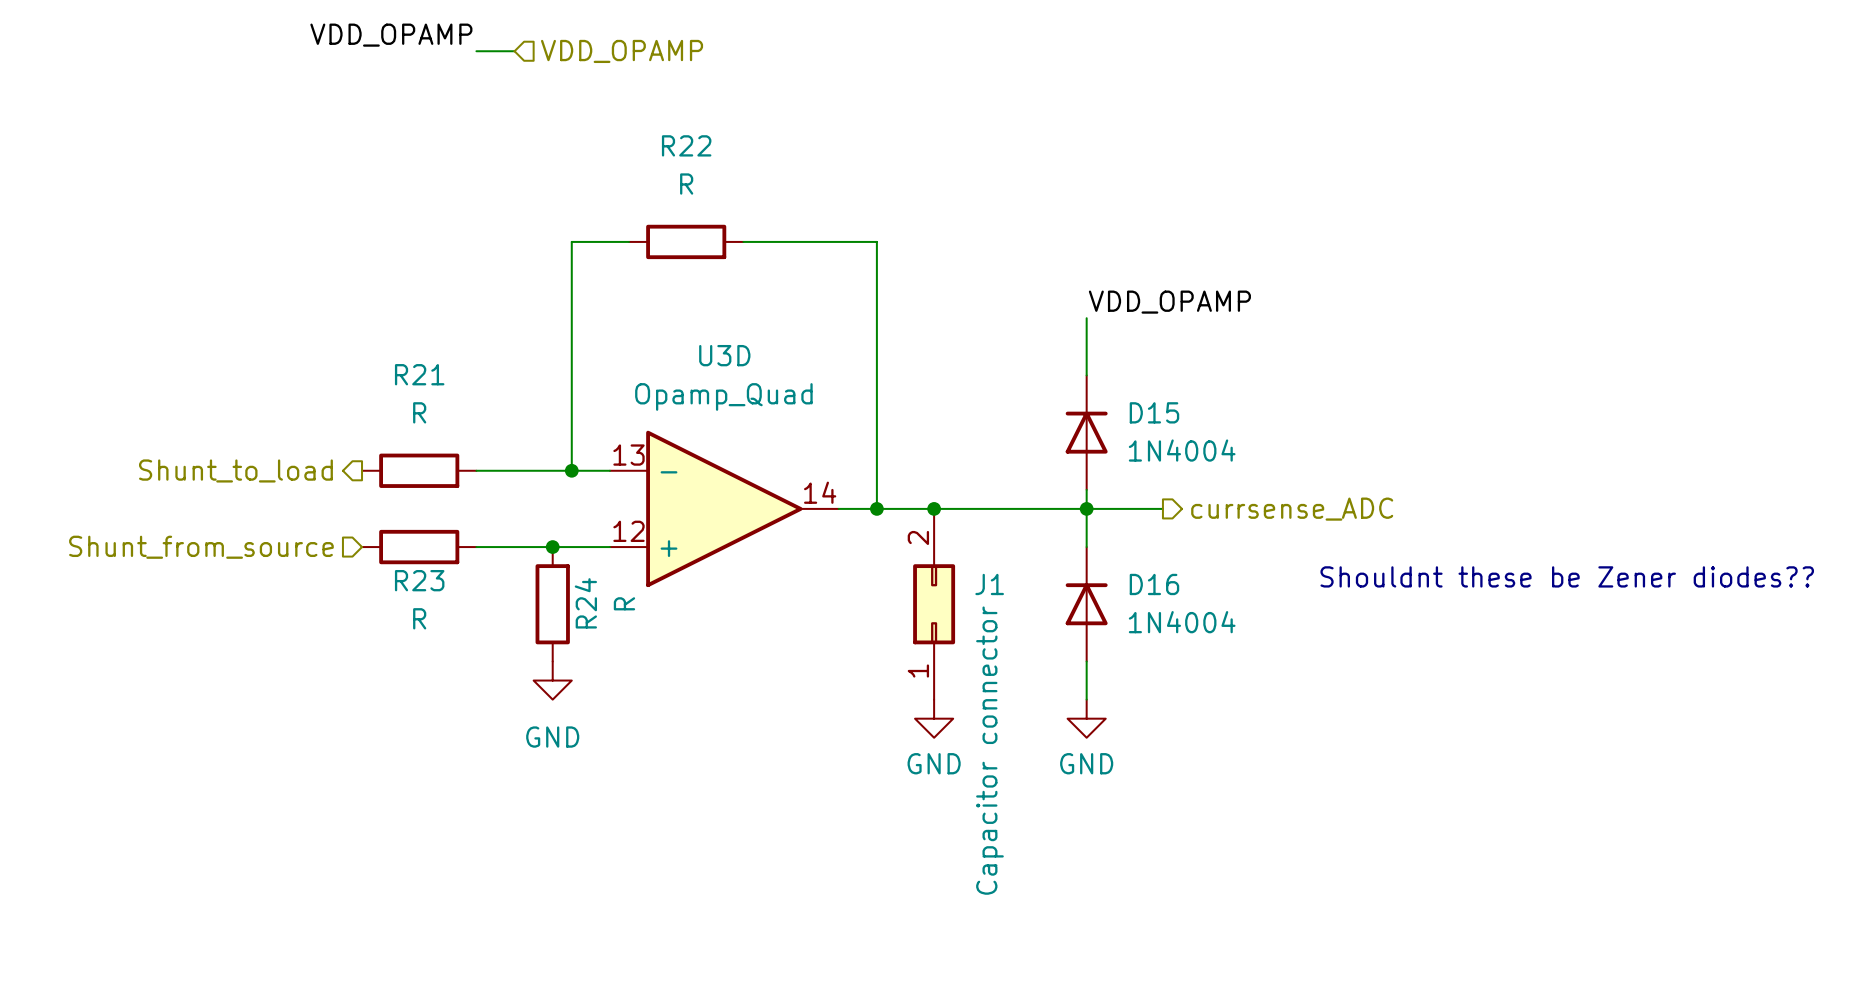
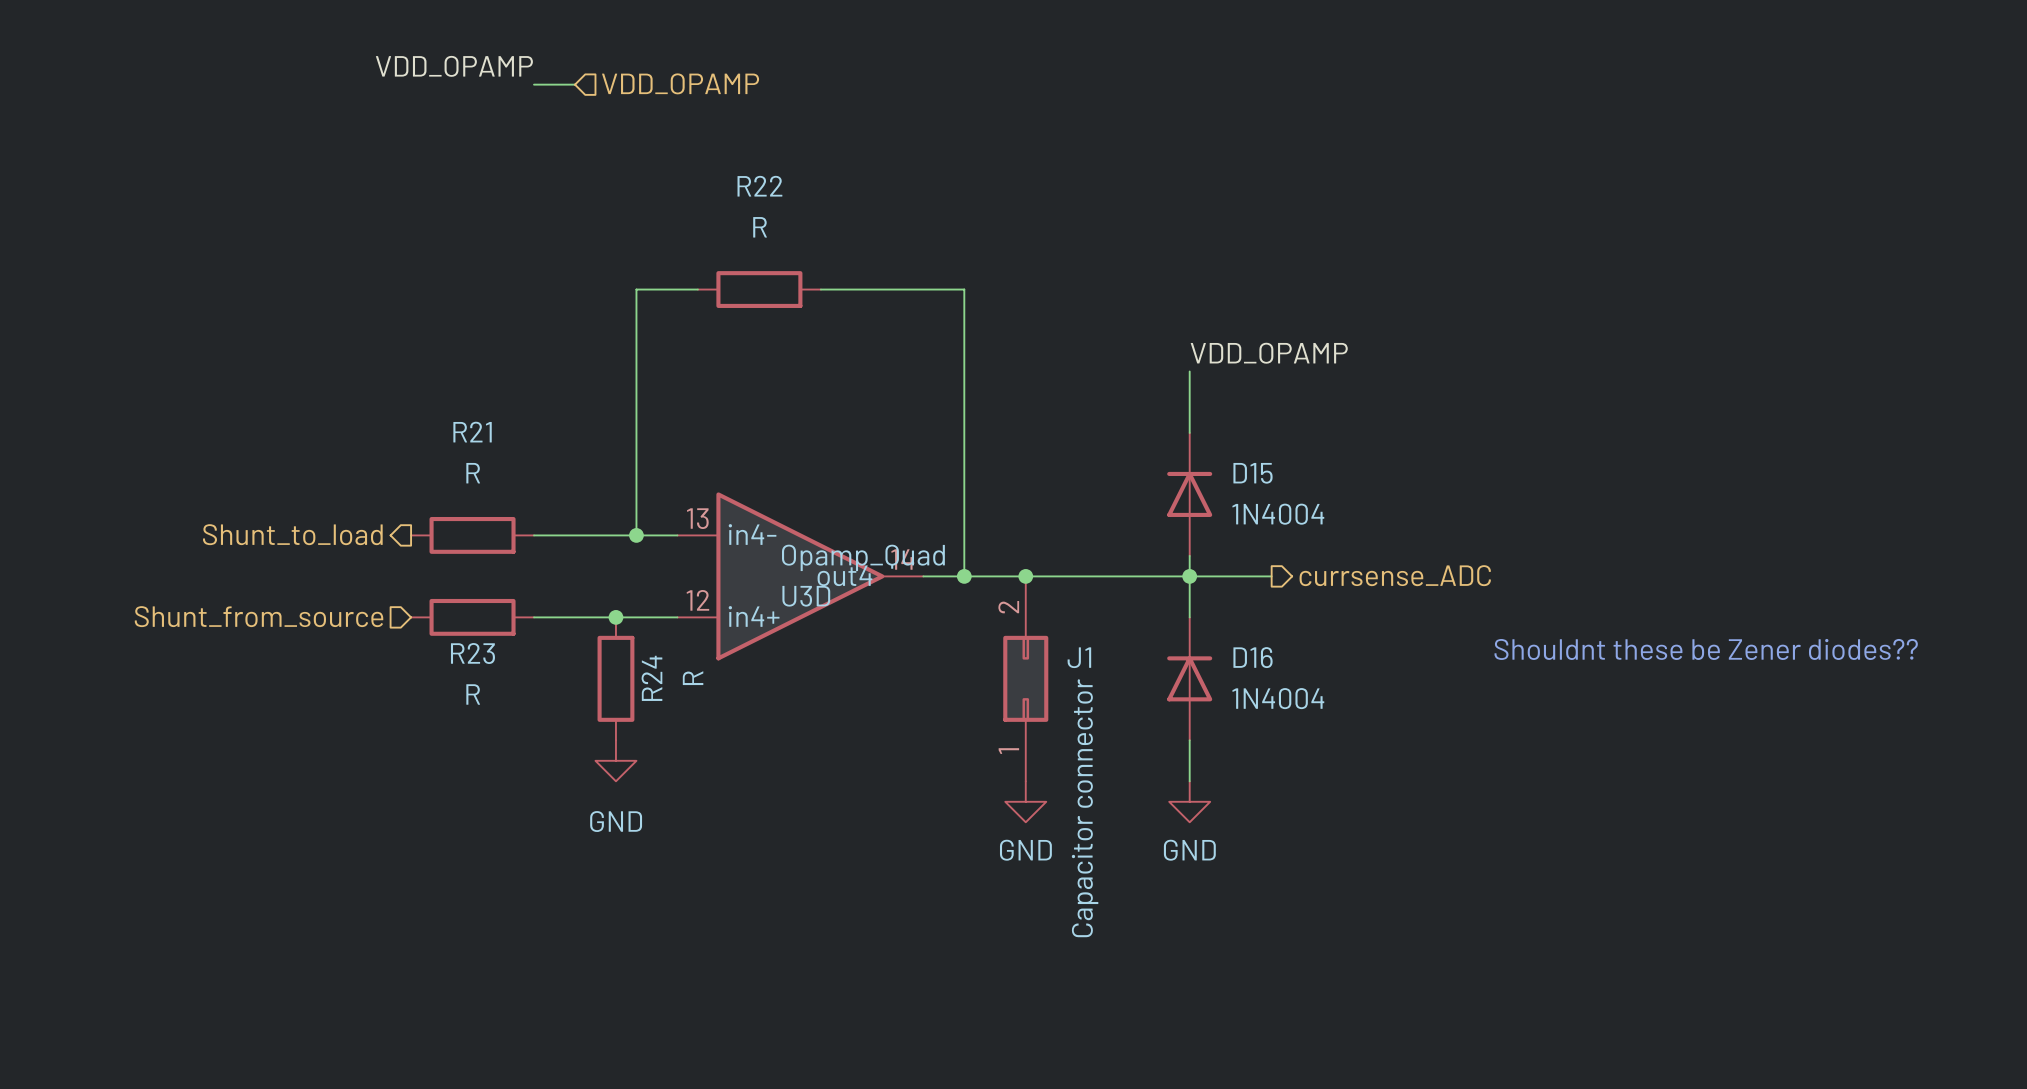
U3D name position: U3D (724, 355) -> U3D (806, 596)
U3D value position: Opamp_Quad (723, 396) -> Opamp_Quad (863, 557)
U3D pin name: - (669, 472) -> in4- (752, 534)
U3D pin name: none -> out4 (844, 575)
U3D pin name: + (669, 548) -> in4+ (754, 616)

